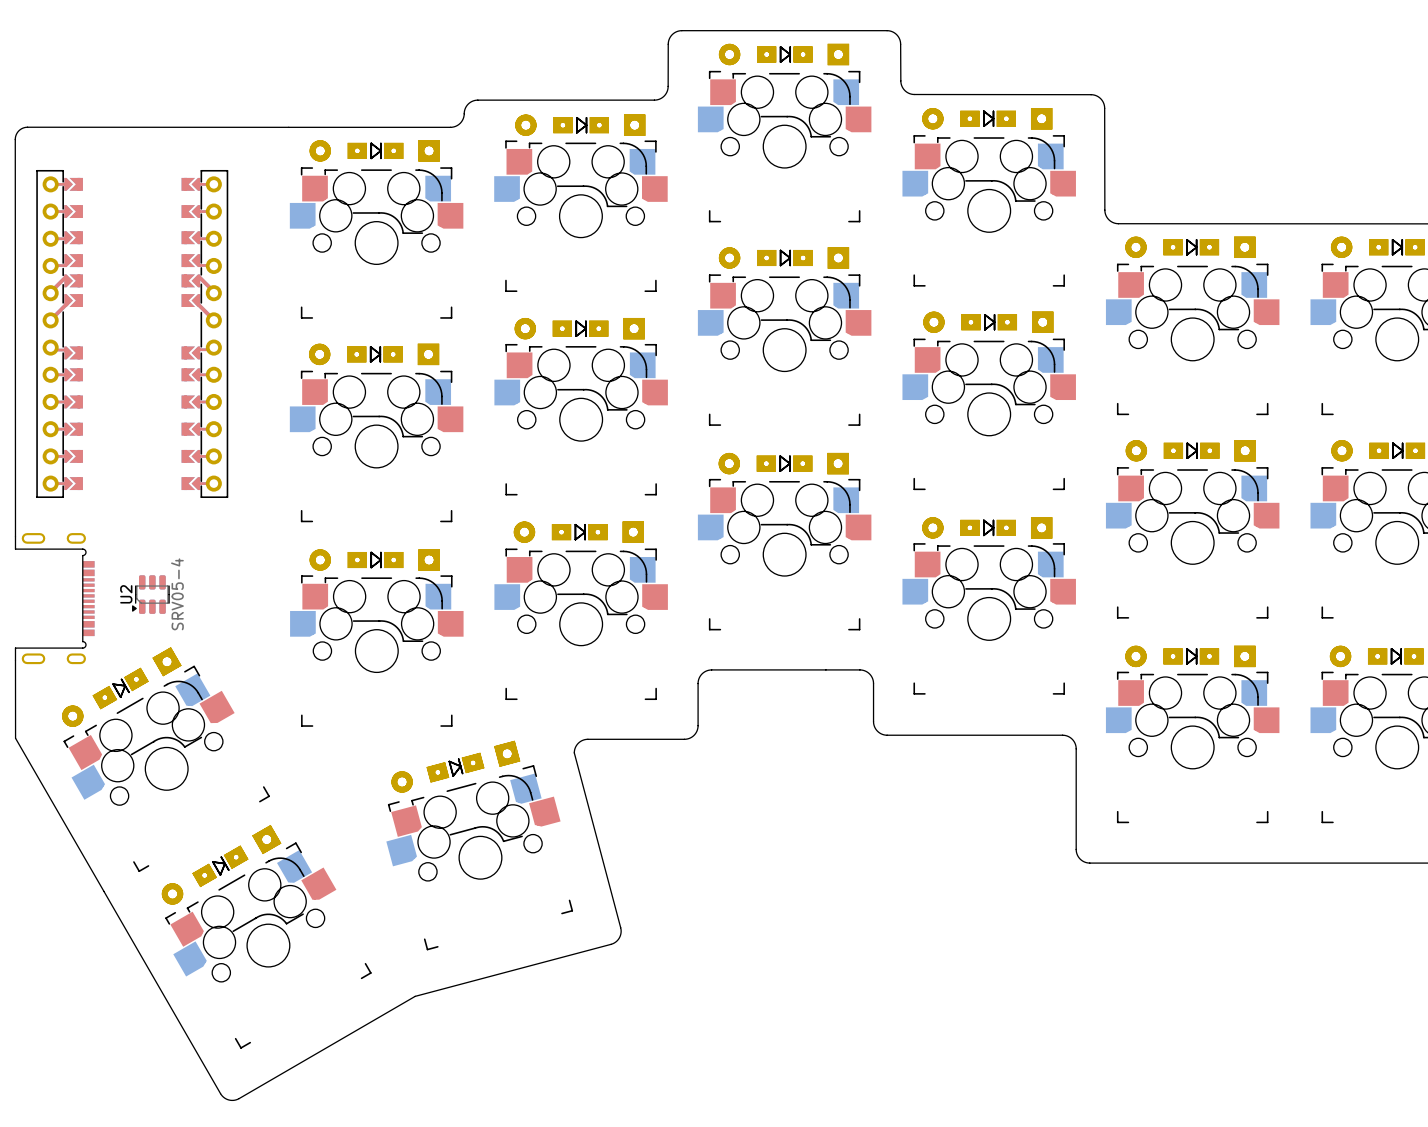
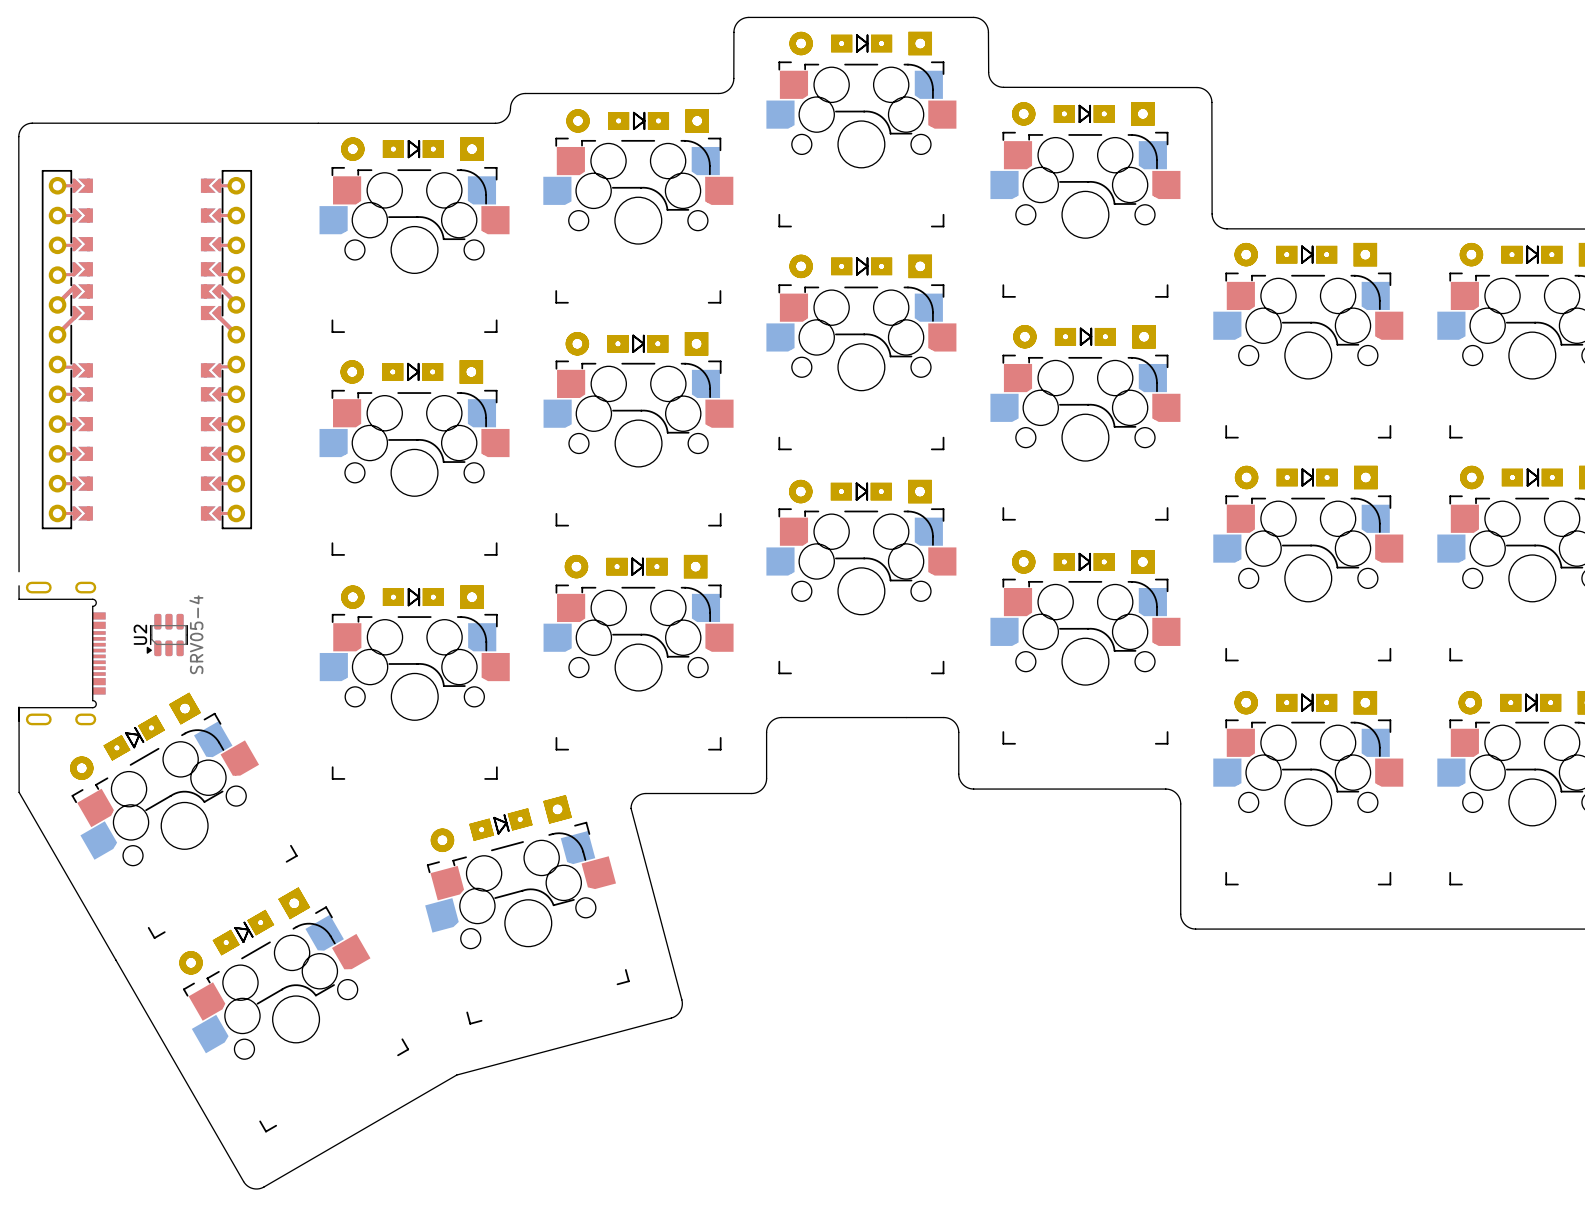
part position: (54, 598) -> (62, 653)

